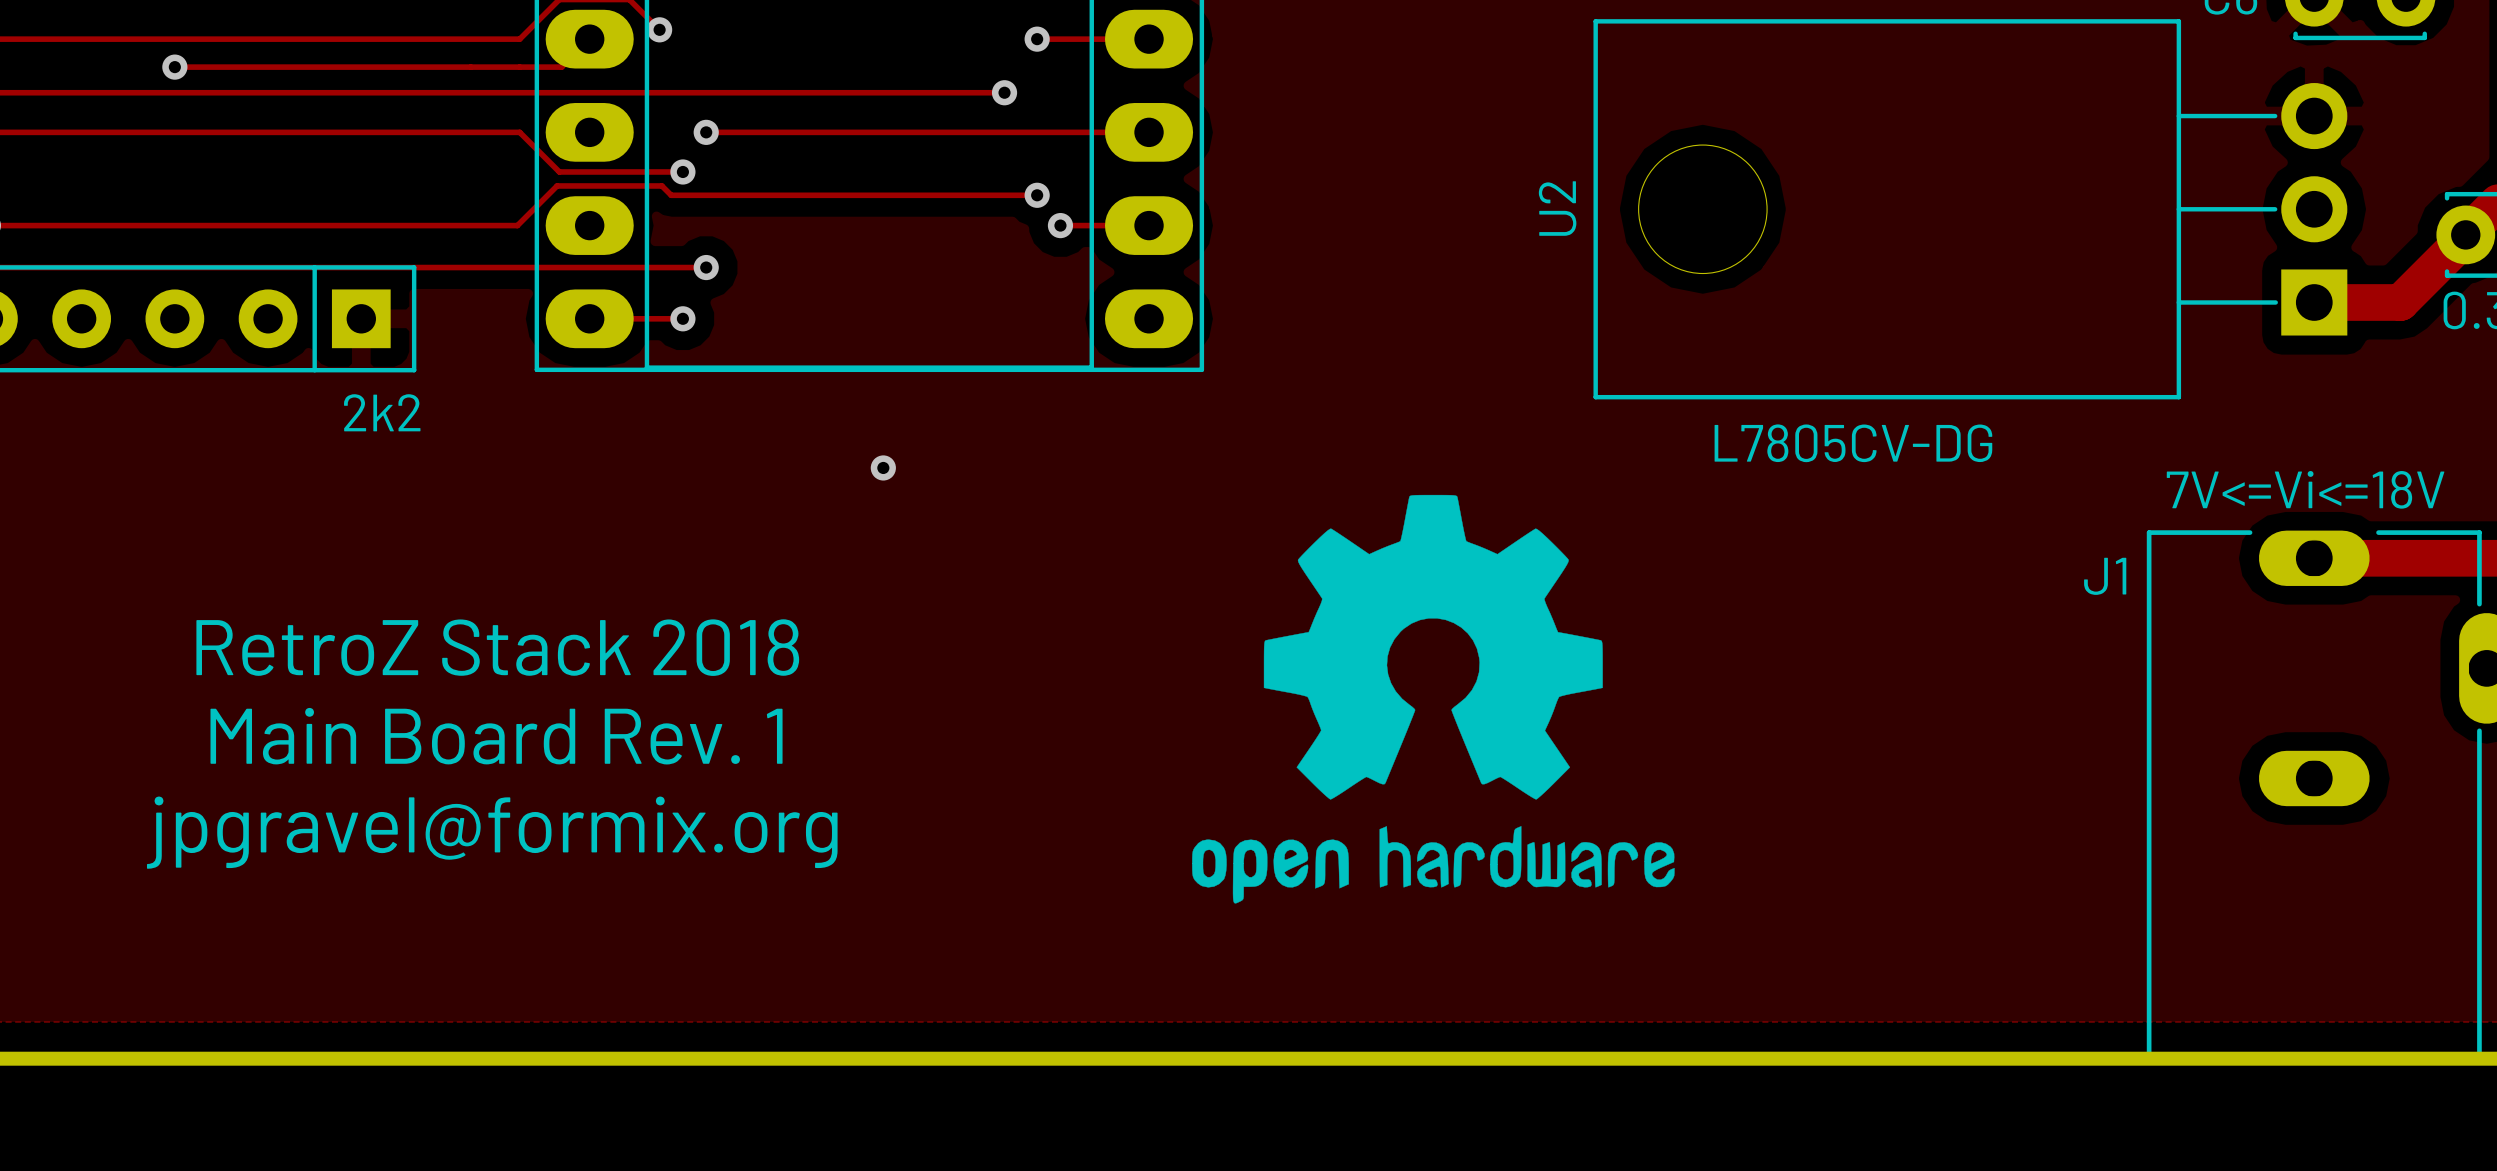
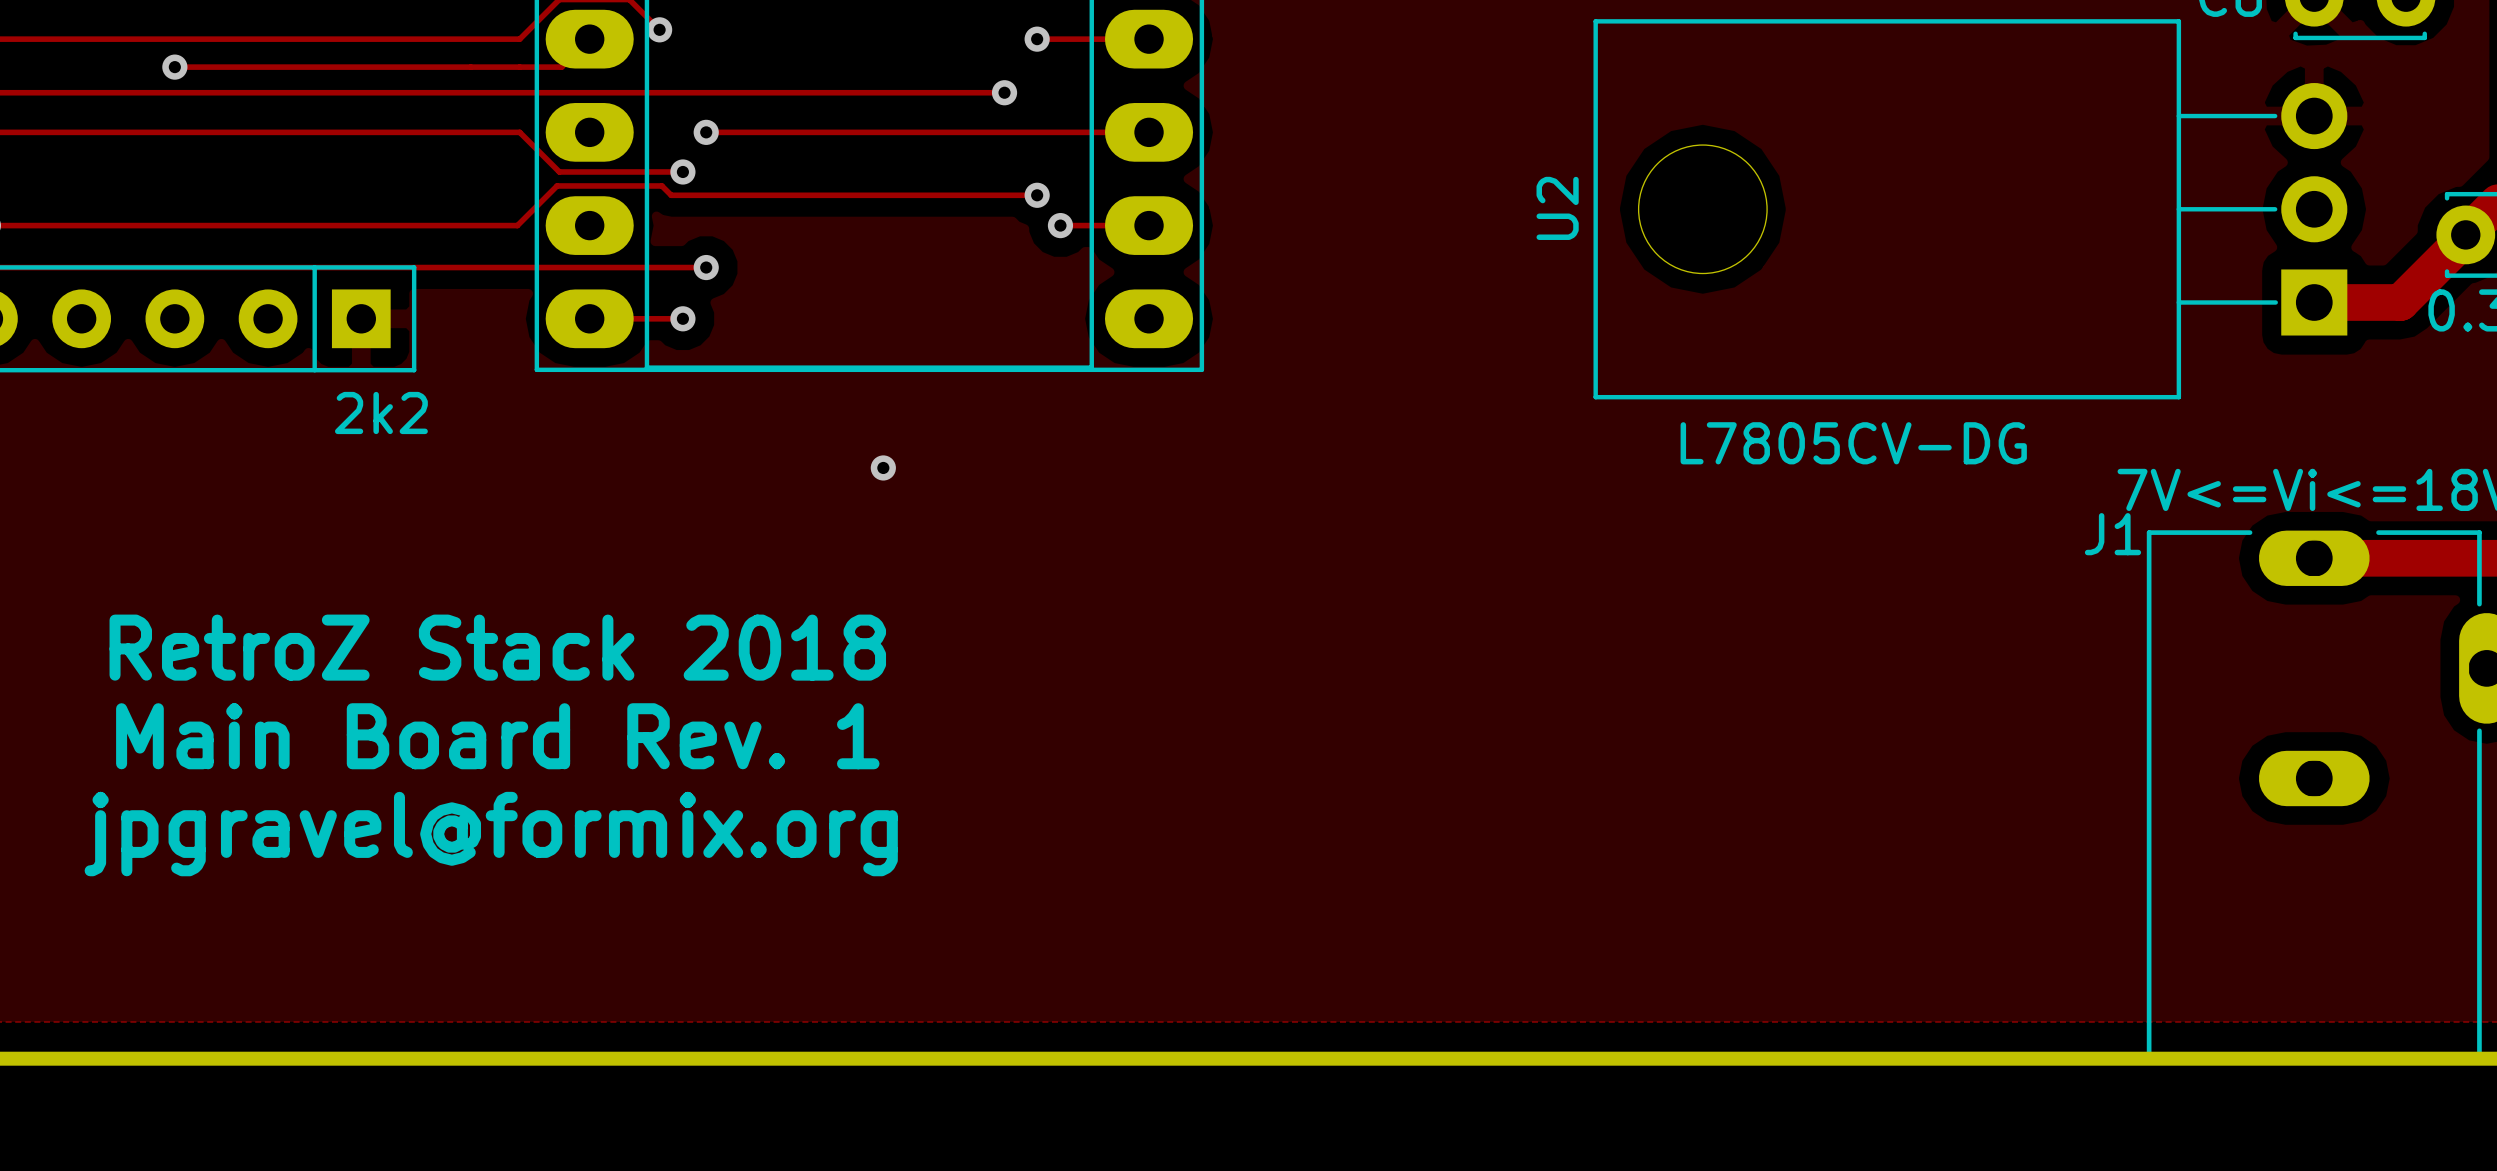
drawing: [1192, 494, 1675, 904] -> none
J1 name position: J1 (2105, 576) -> J1 (2112, 534)

